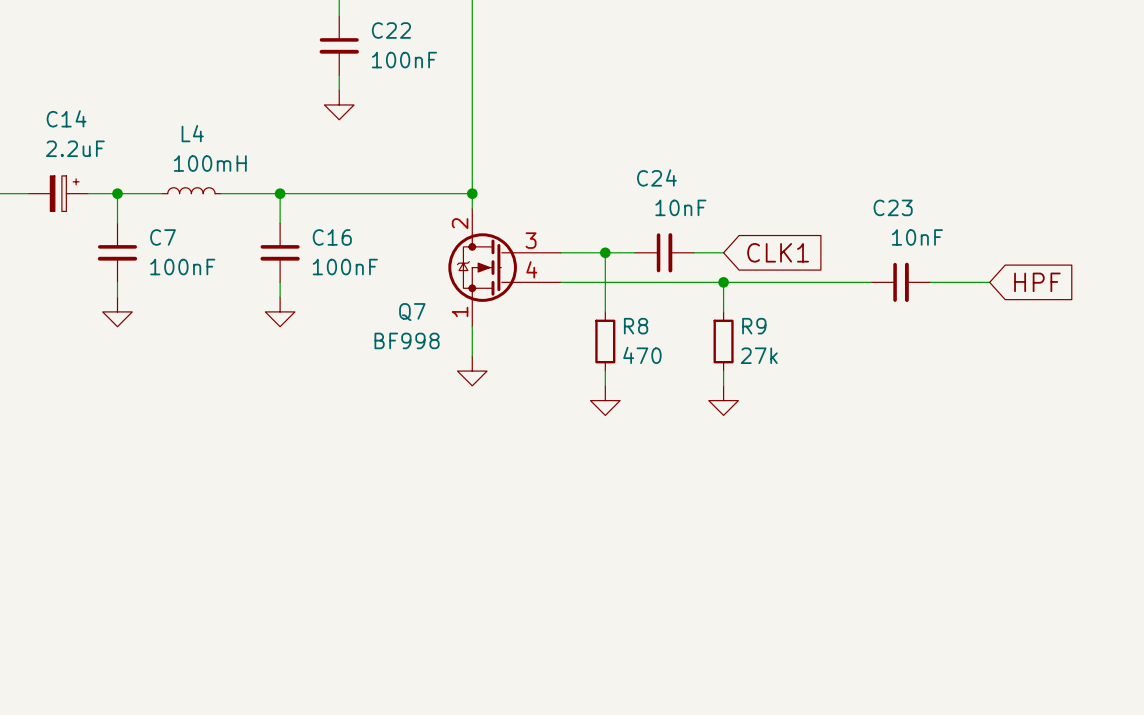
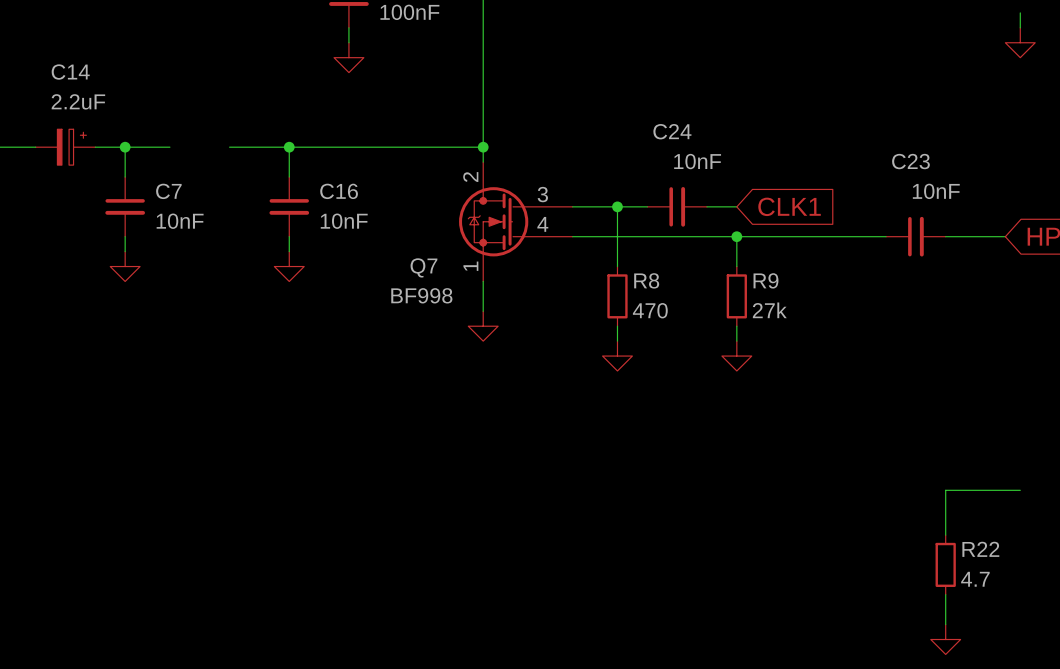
wire: none -> (1020, 12) (1020, 27)
power symbol: none -> (1020, 42)
L4: 100mH (191, 190) -> none
C7 value: 100nF (182, 267) -> 10nF (180, 221)
C16 value: 100nF (345, 267) -> 10nF (344, 221)
wire: none -> (1020, 490) (945, 490) (945, 535)
R22: none -> 4.7 (945, 564)
wire: none -> (945, 594) (945, 624)
power symbol: none -> (945, 639)

